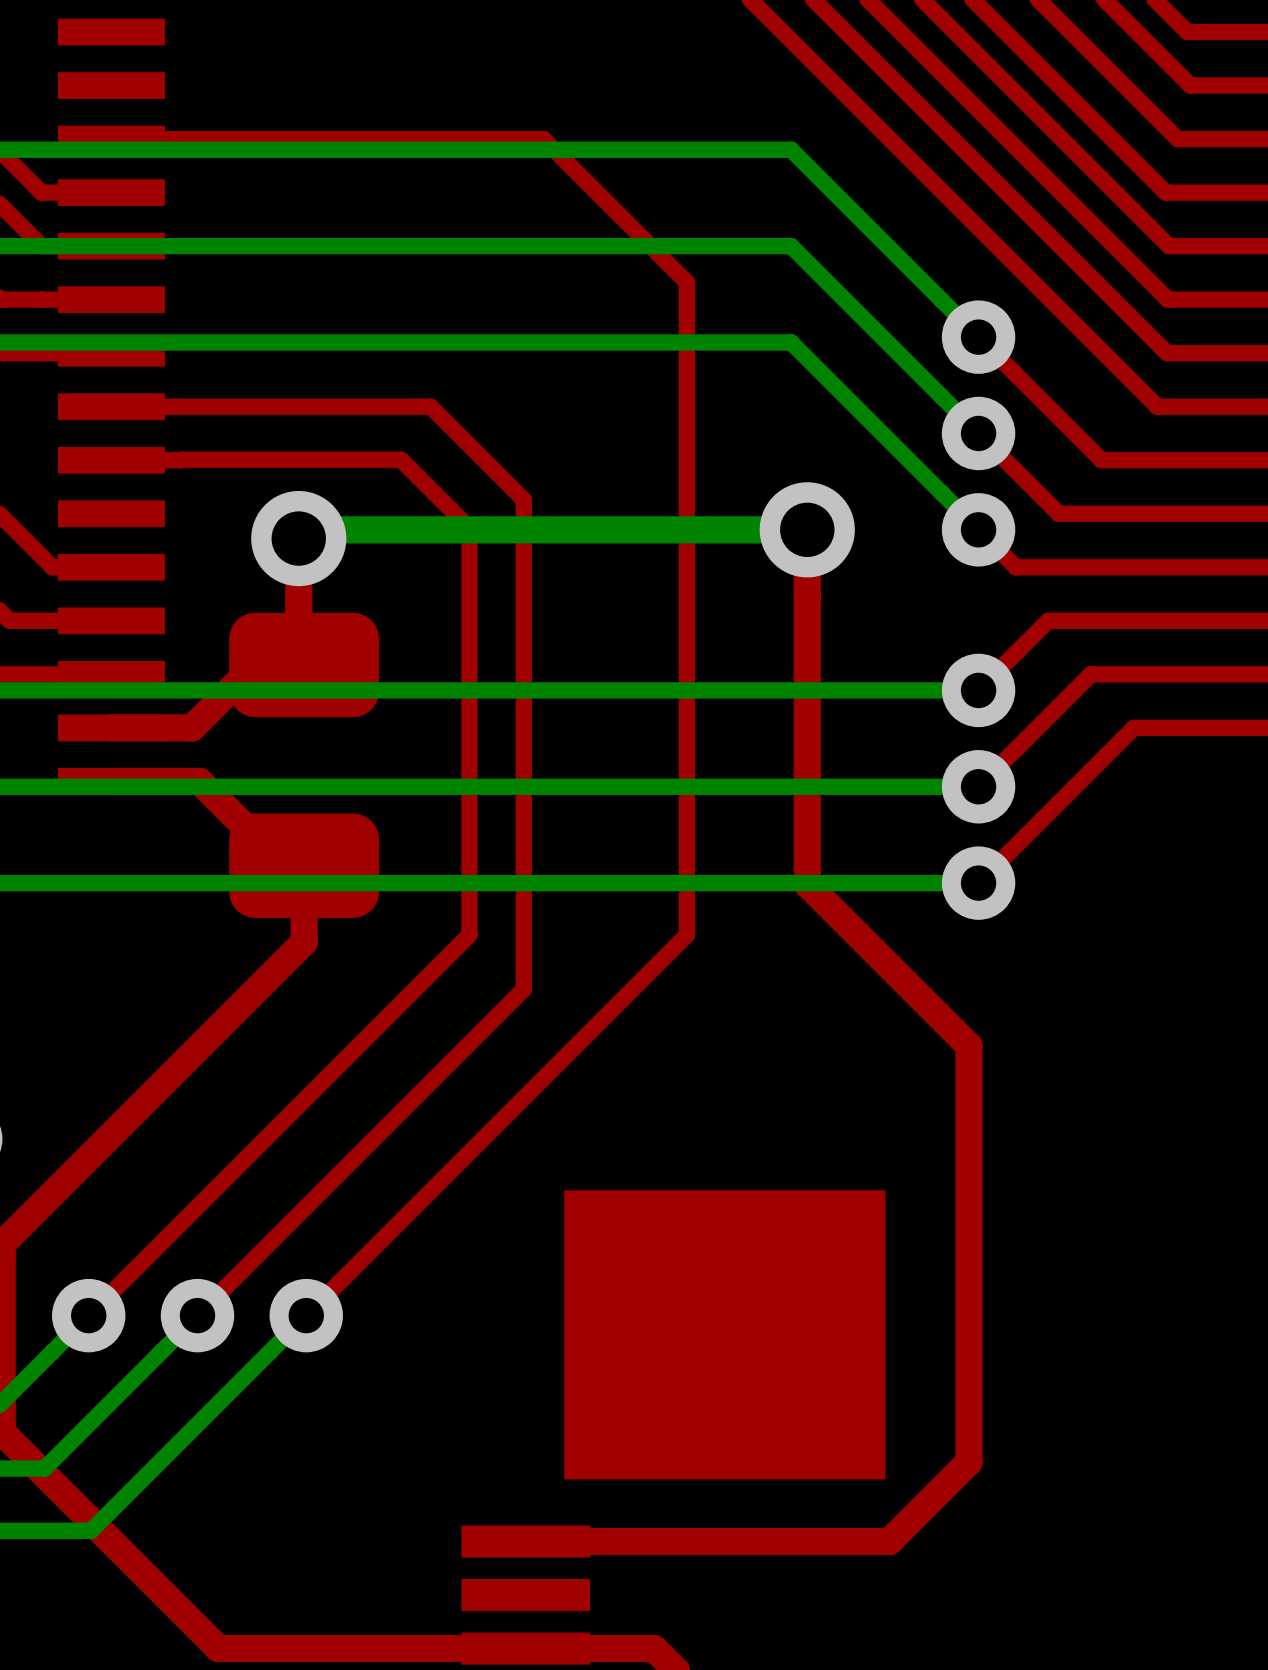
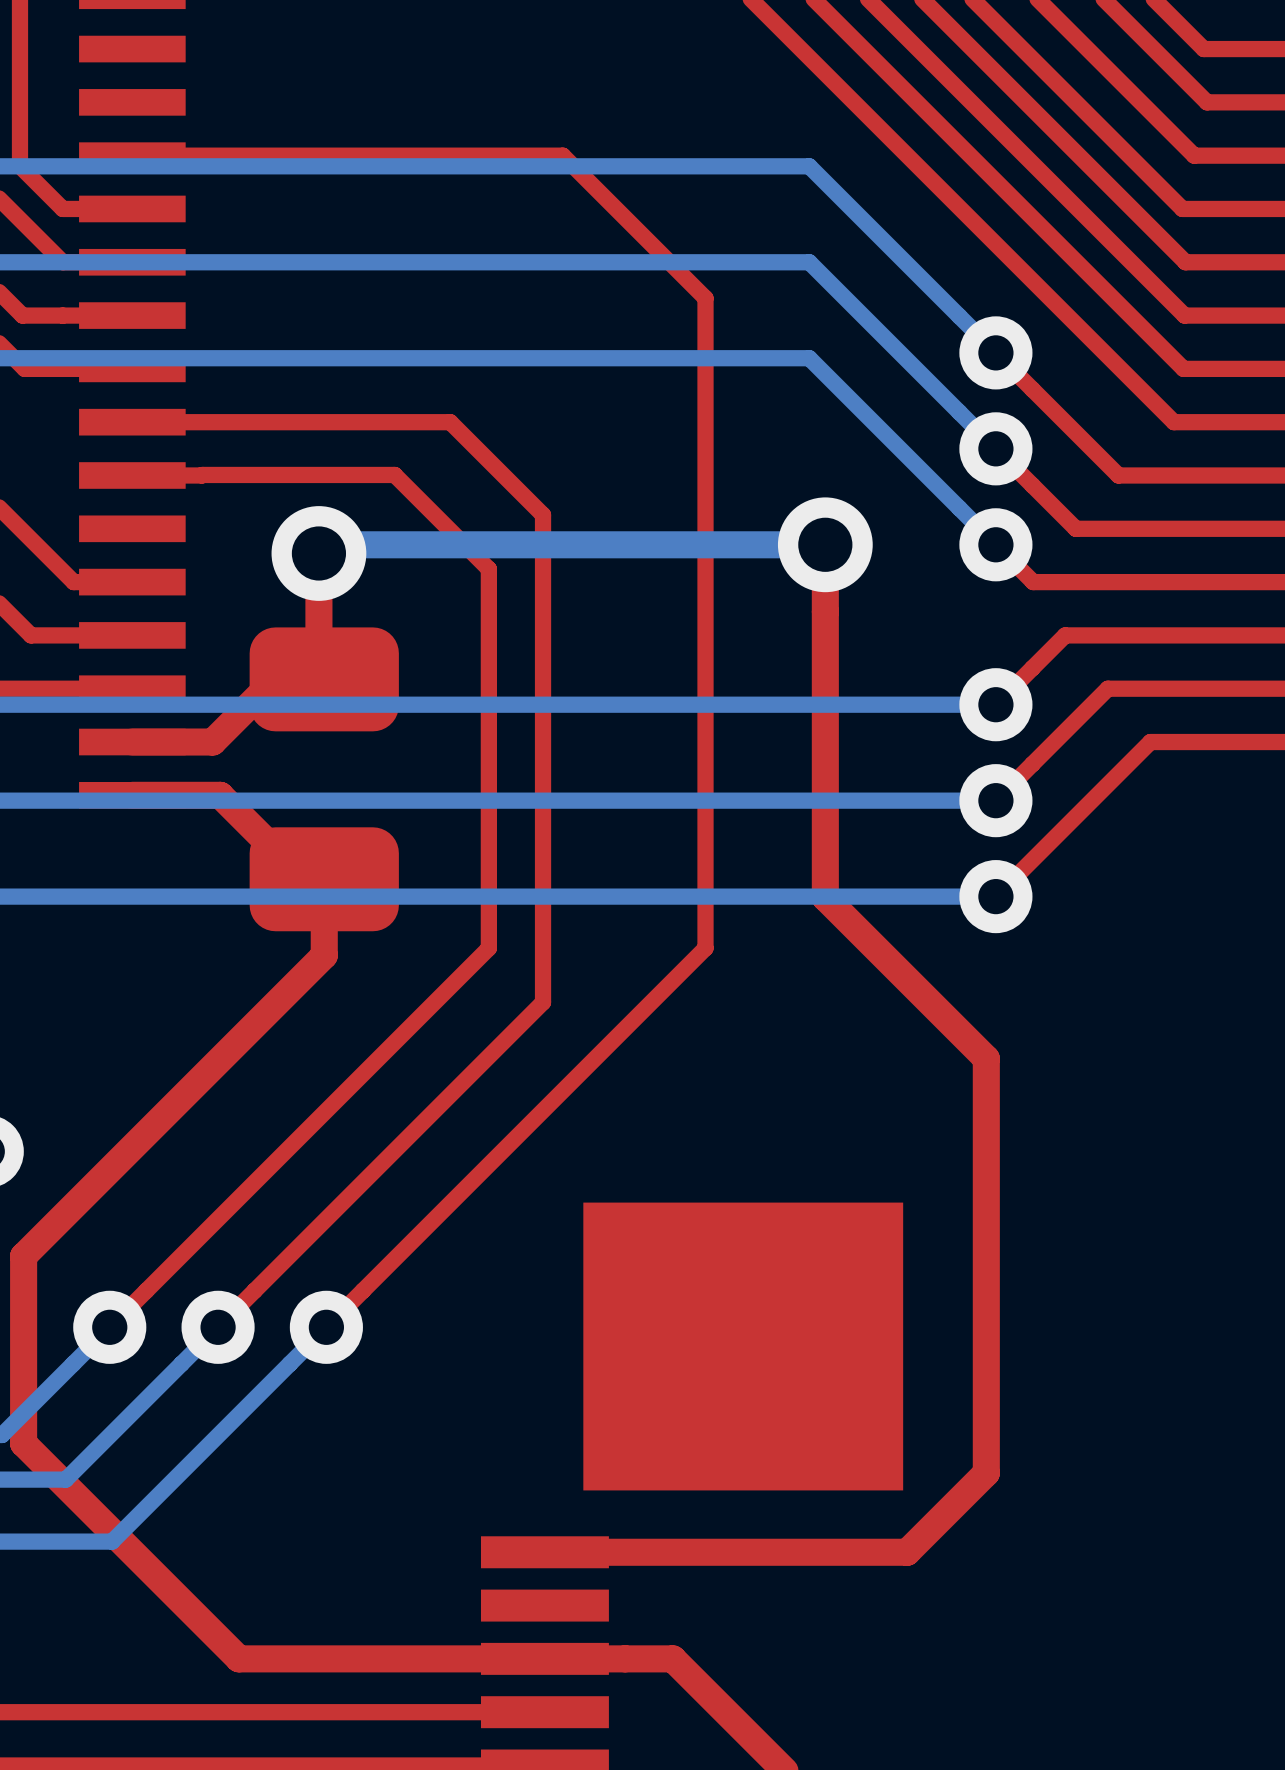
top track: (374, 459) (401, 459) (469, 528) (469, 554) -> (394, 474) (488, 569)

